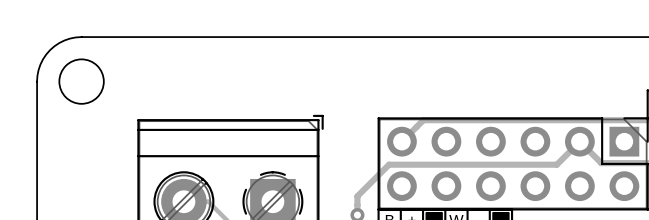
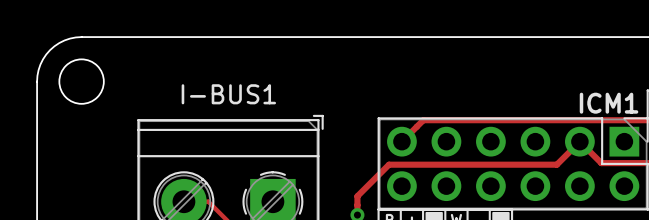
I-BUS1 name: none -> I-BUS1 (228, 94)
ICM1 name: none -> ICM1 (609, 103)

